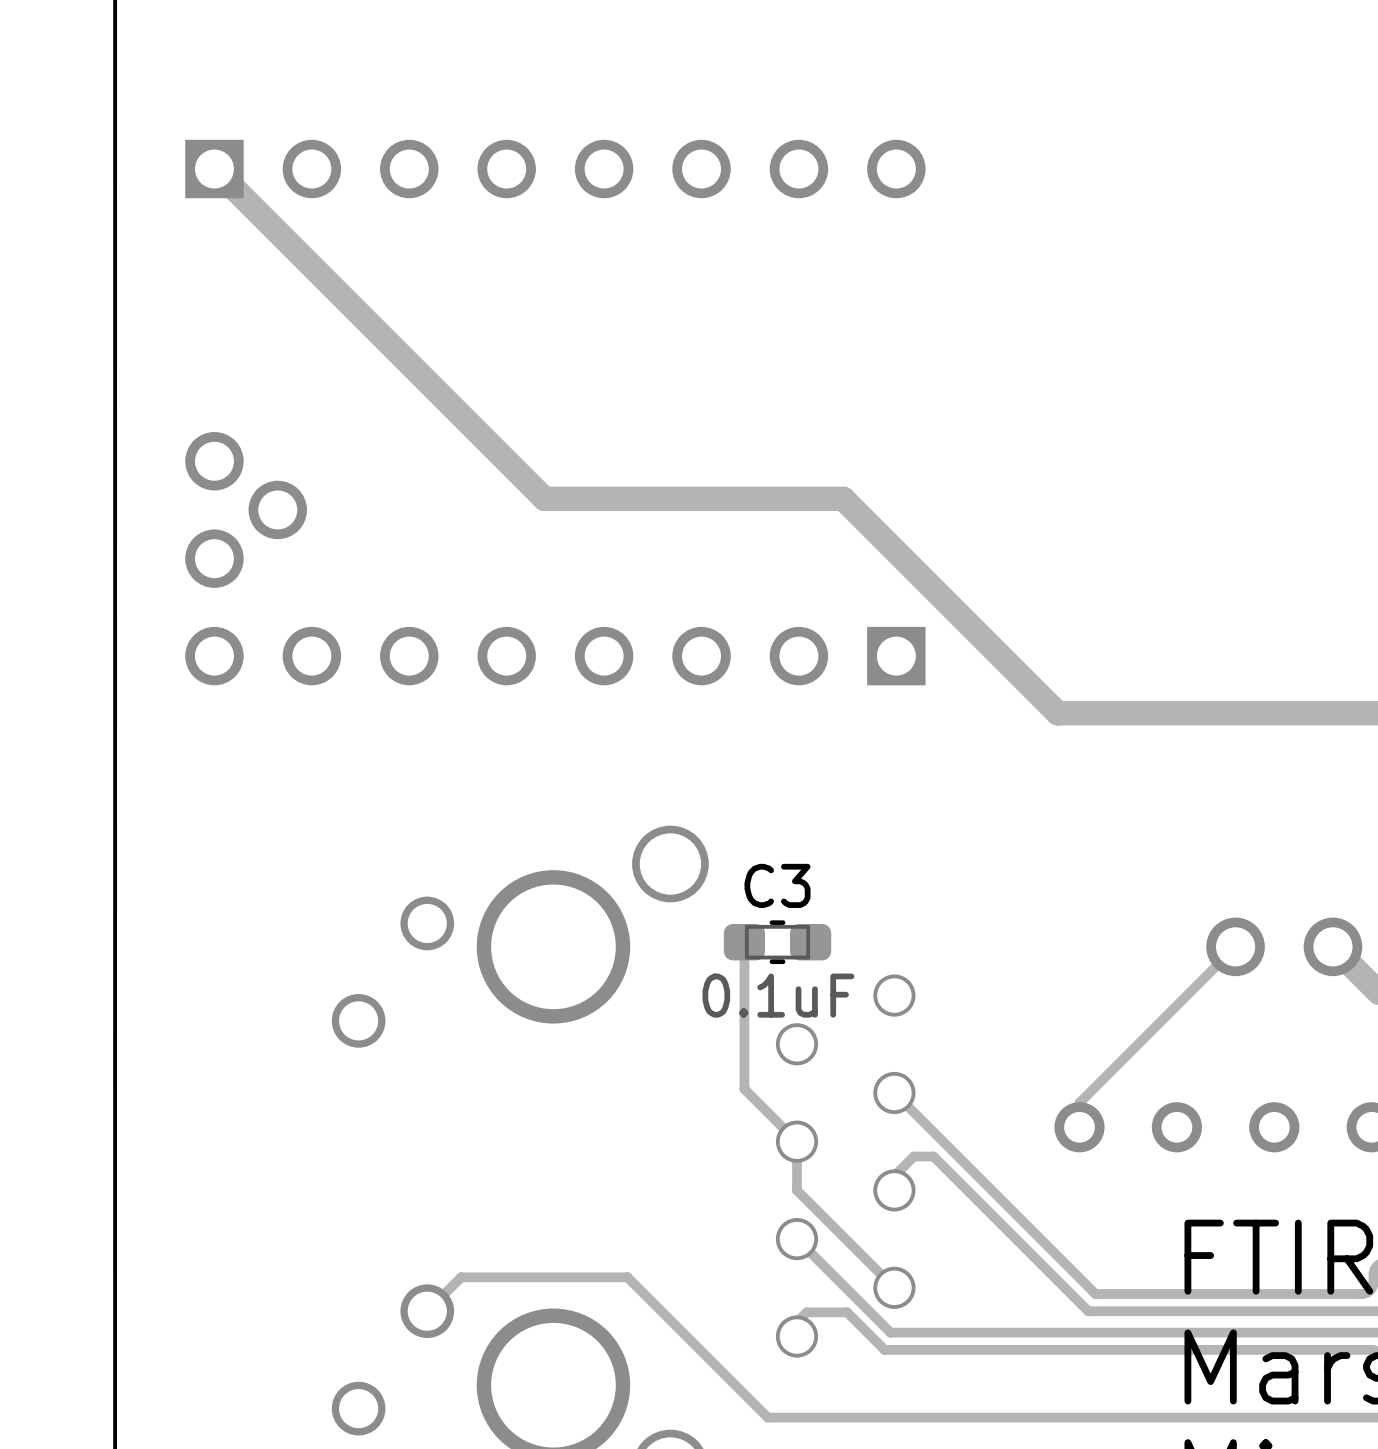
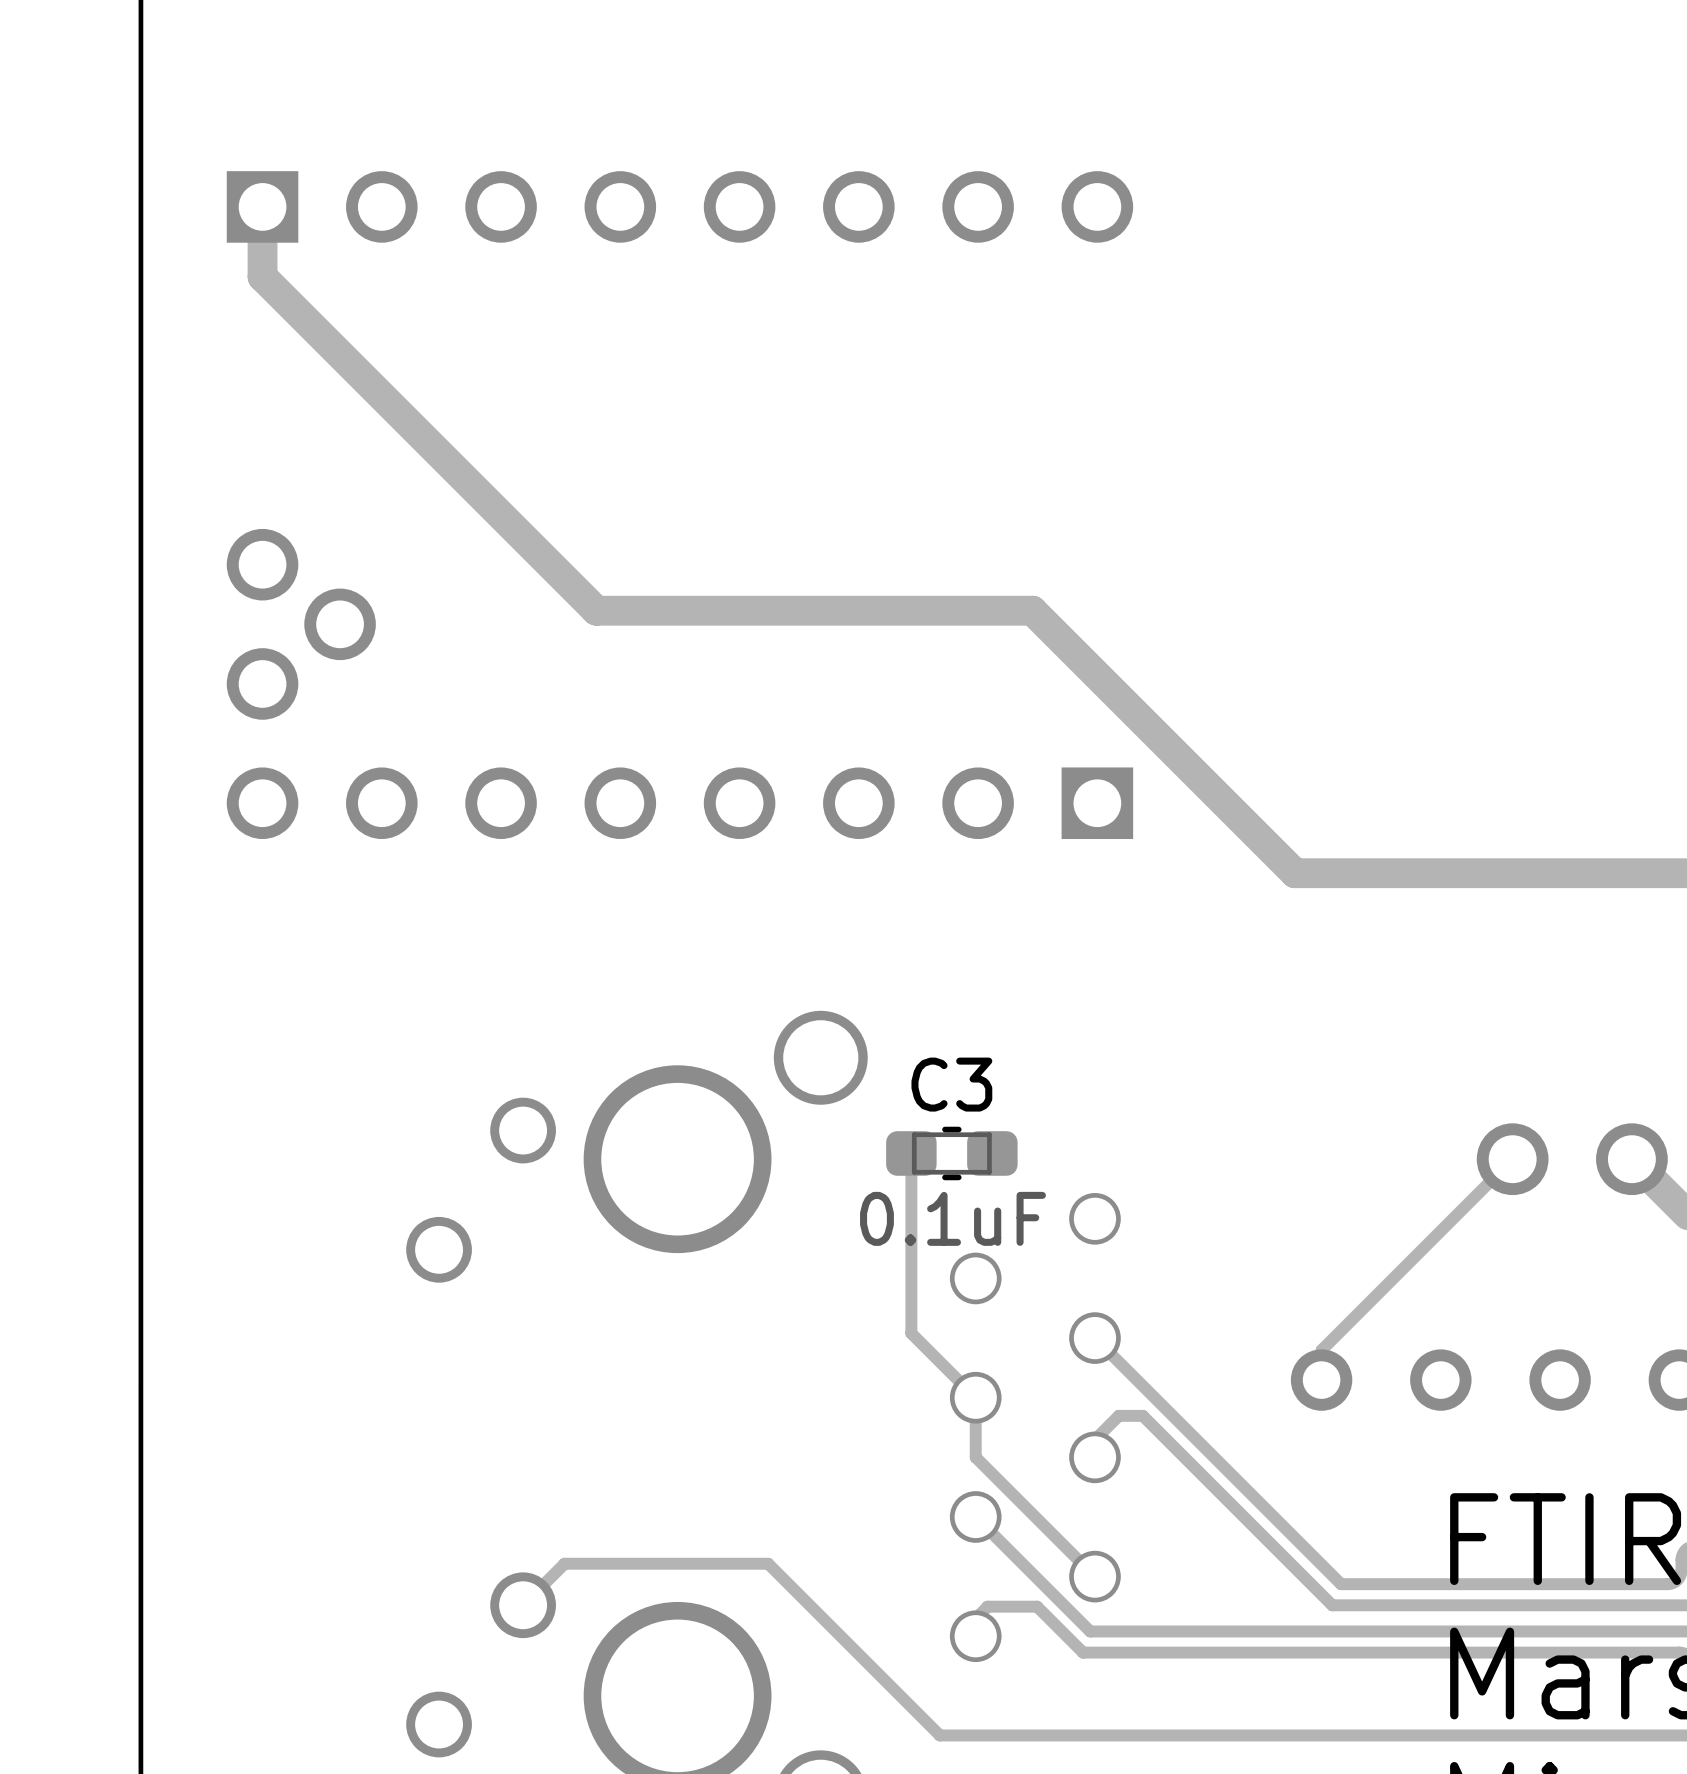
track: (214, 169) (544, 498) -> (262, 206) (262, 276) (596, 610) (666, 610)

